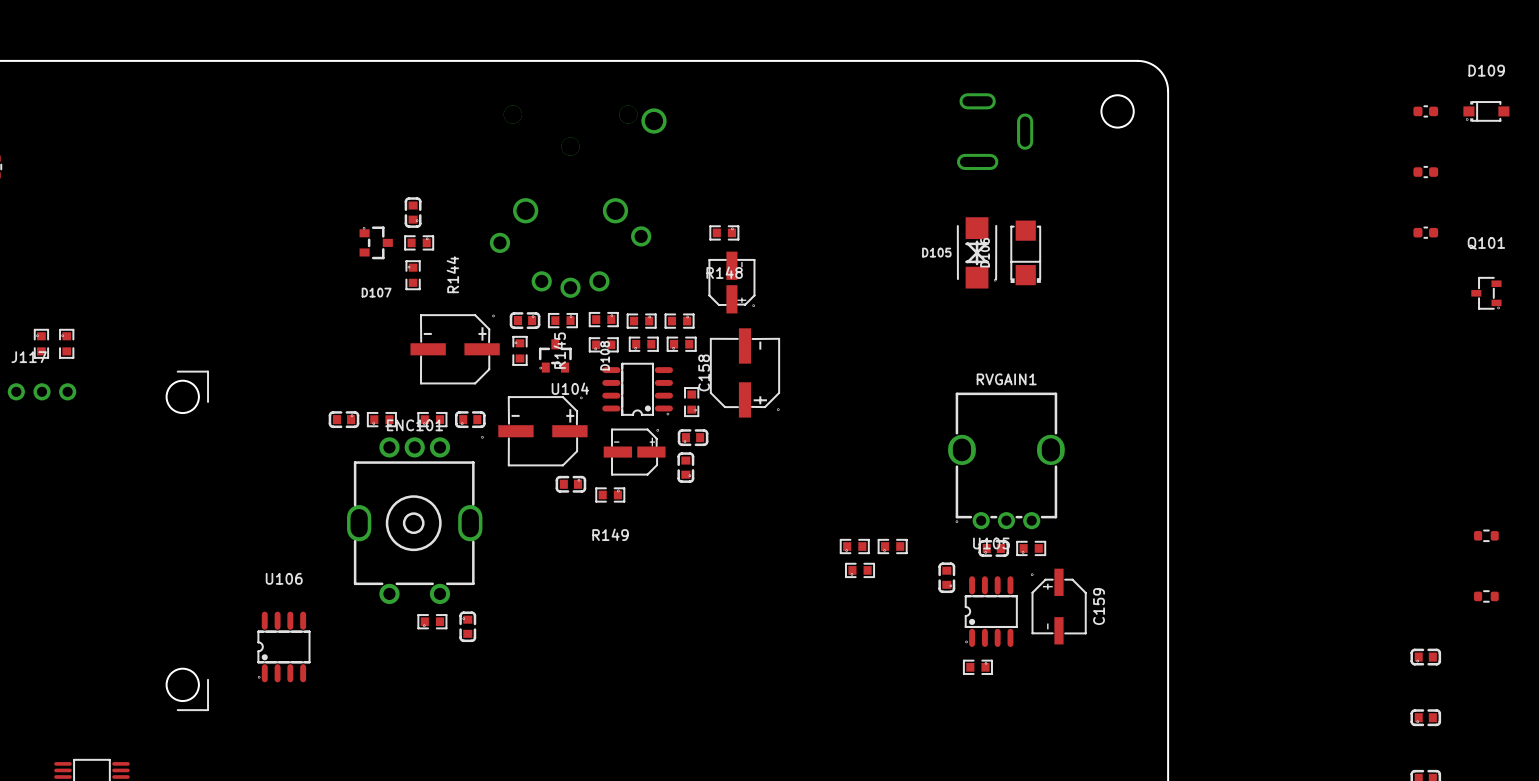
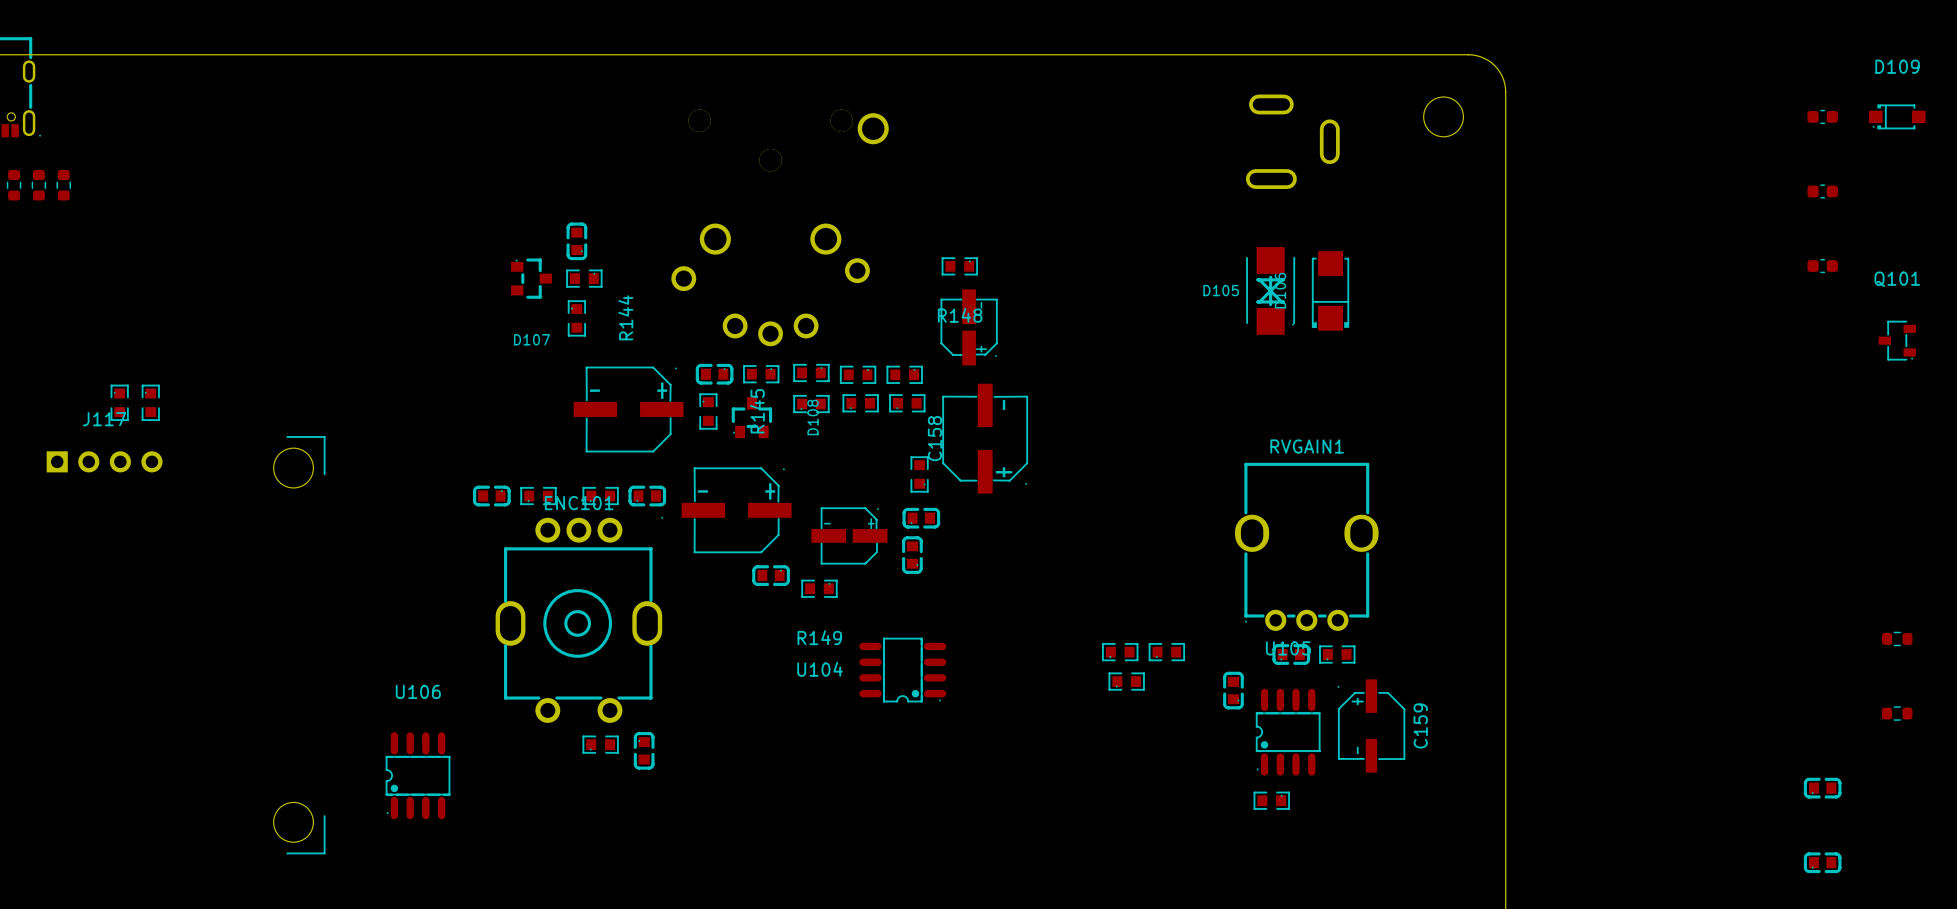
U104 position: (637, 389) -> (902, 670)

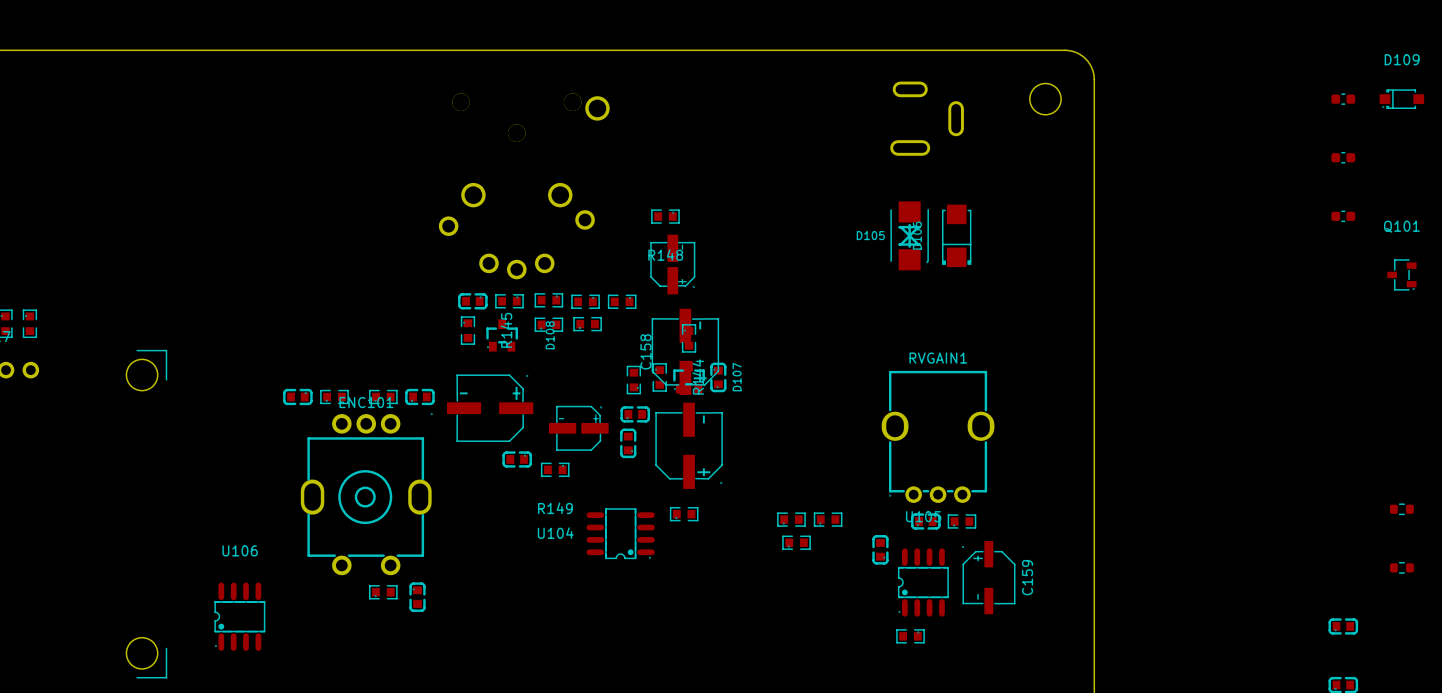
part: (576, 241) -> none
D107 rotation: 0° (531, 278) -> 90° counterclockwise (689, 377)
D107 position: (531, 278) -> (689, 377)
part: (584, 278) -> none
R144 position: (576, 318) -> (659, 377)
part rotation: 0° (907, 403) -> 90° clockwise (689, 338)
part position: (907, 403) -> (689, 338)
part: (628, 409) -> none
part: none -> (718, 377)
part: none -> (689, 445)
part: none -> (684, 514)

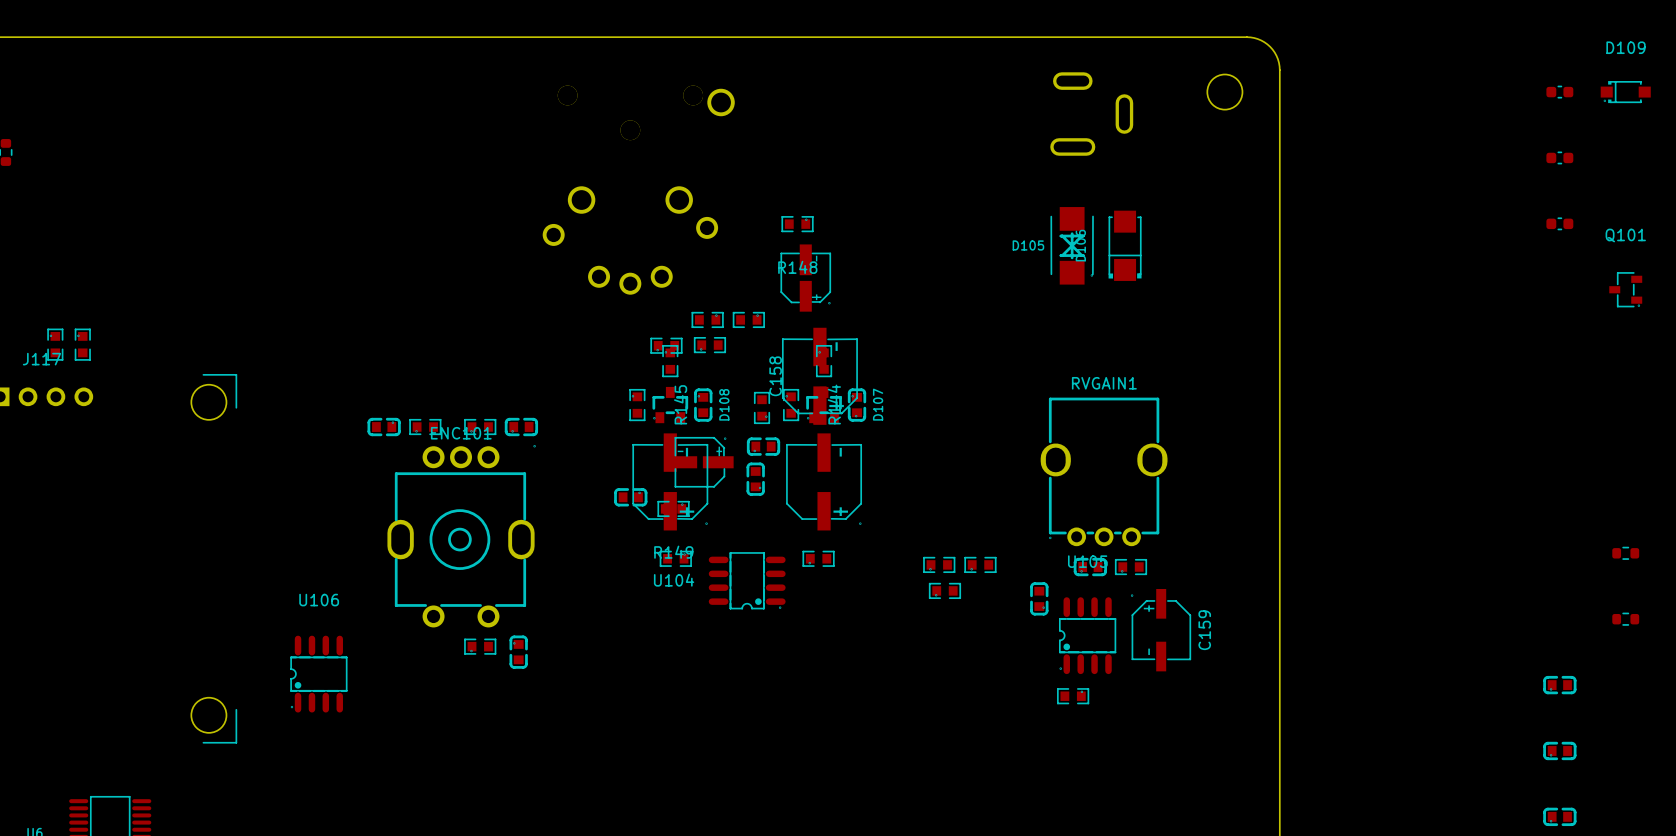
part: (548, 300) -> none
part rotation: 0° (472, 301) -> 90° counterclockwise (703, 405)
part position: (472, 301) -> (703, 405)
part: (509, 301) -> none
R145 position: (467, 330) -> (637, 405)
D108 position: (502, 335) -> (670, 405)
part: none -> (670, 361)
part rotation: 0° (490, 408) -> 90° clockwise (670, 481)
part position: (490, 408) -> (670, 481)
part: none -> (675, 558)

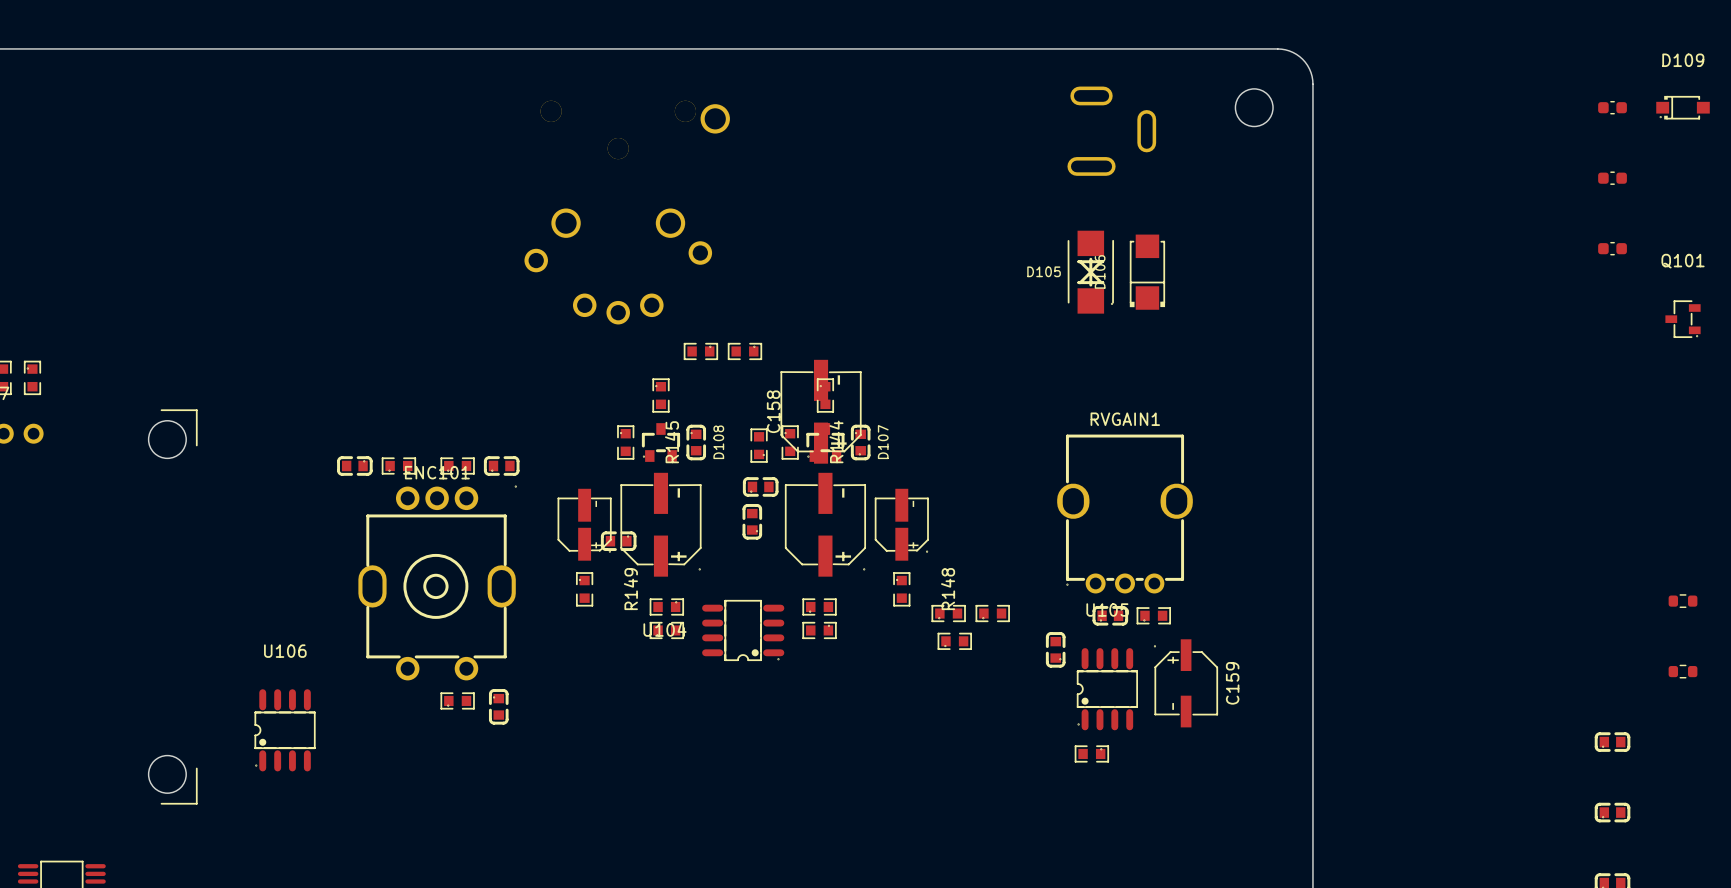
R148 rotation: 0° (797, 224) -> 90° counterclockwise (901, 589)
R148 position: (797, 224) -> (901, 589)
part: (805, 278) -> none
part: (666, 345) -> none
part: (709, 345) -> none
part: (700, 462) -> none
part: none -> (584, 524)
part: none -> (901, 524)
R149 rotation: 0° (673, 508) -> 90° counterclockwise (584, 589)
R149 position: (673, 508) -> (584, 589)
part: none -> (666, 630)
part: none -> (819, 630)

